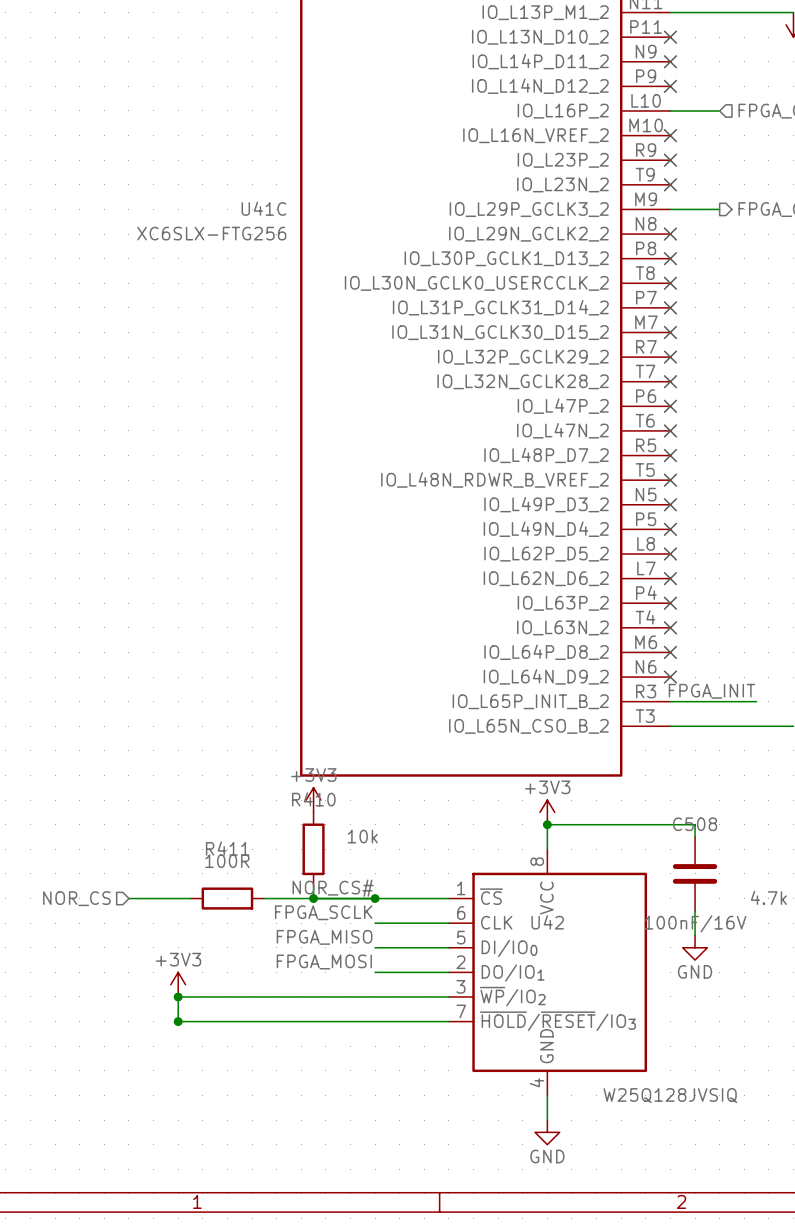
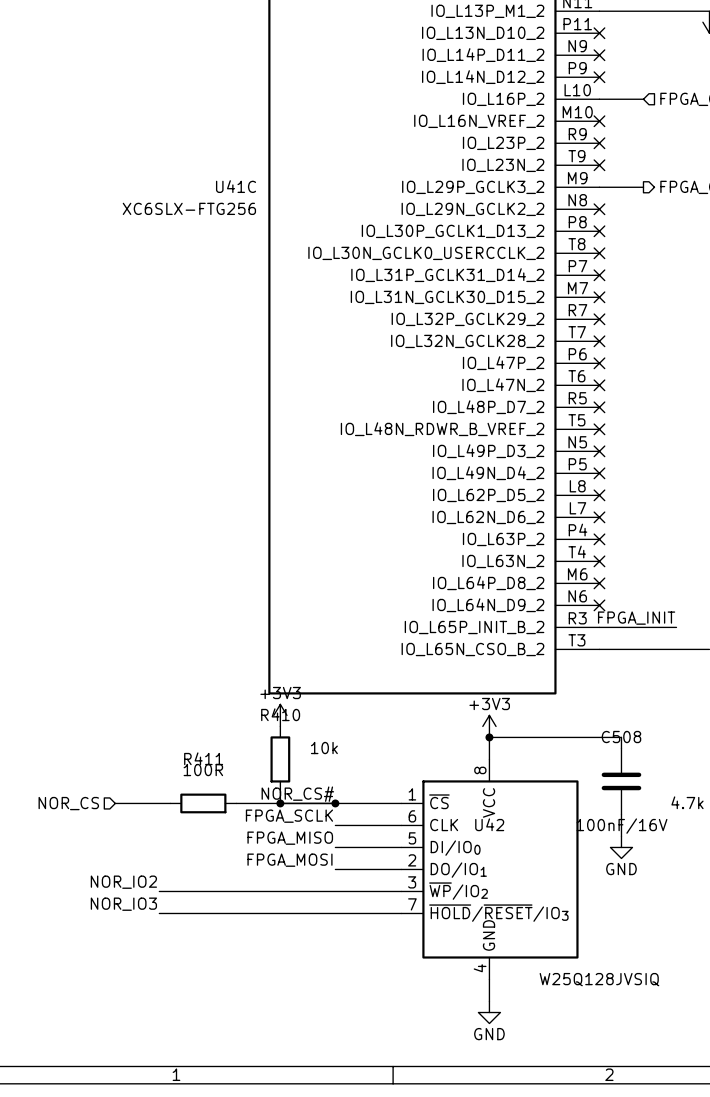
power symbol: +3V3 (178, 984) -> none
label: none -> NOR_IO2 (123, 882)
wire: (178, 996) (178, 1021) -> none
junction: (178, 996) -> none
label: none -> NOR_IO3 (123, 904)
junction: (178, 1021) -> none

